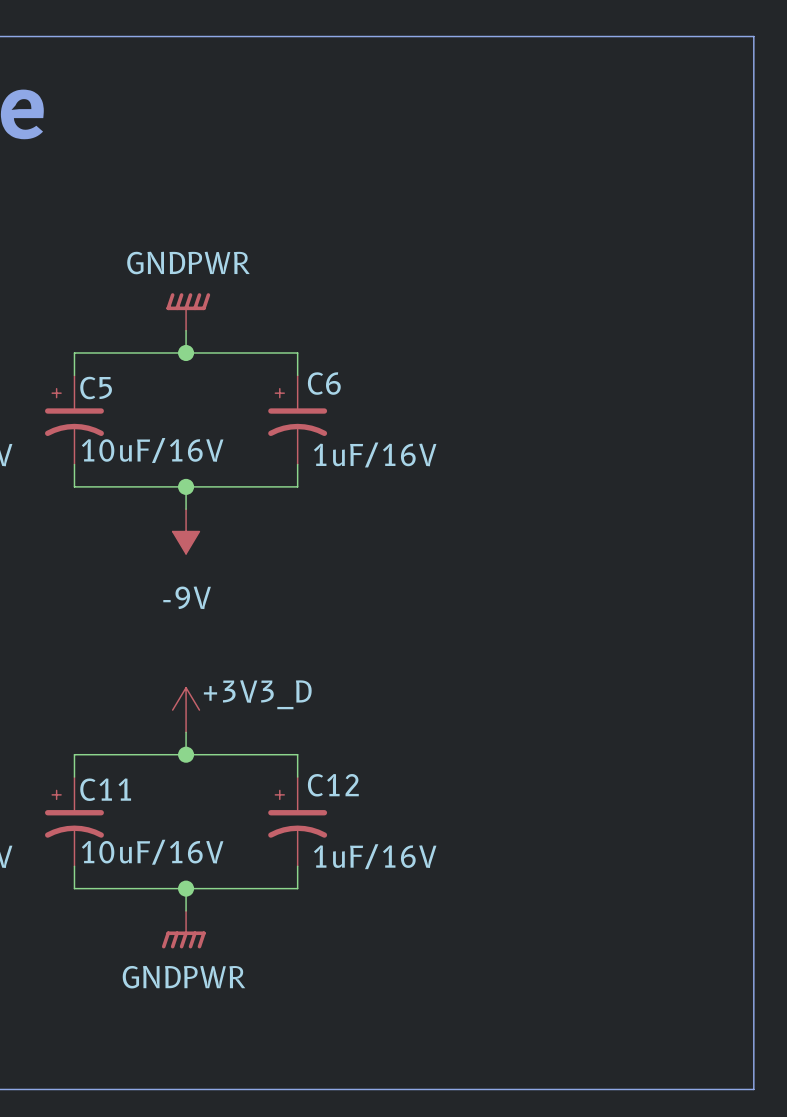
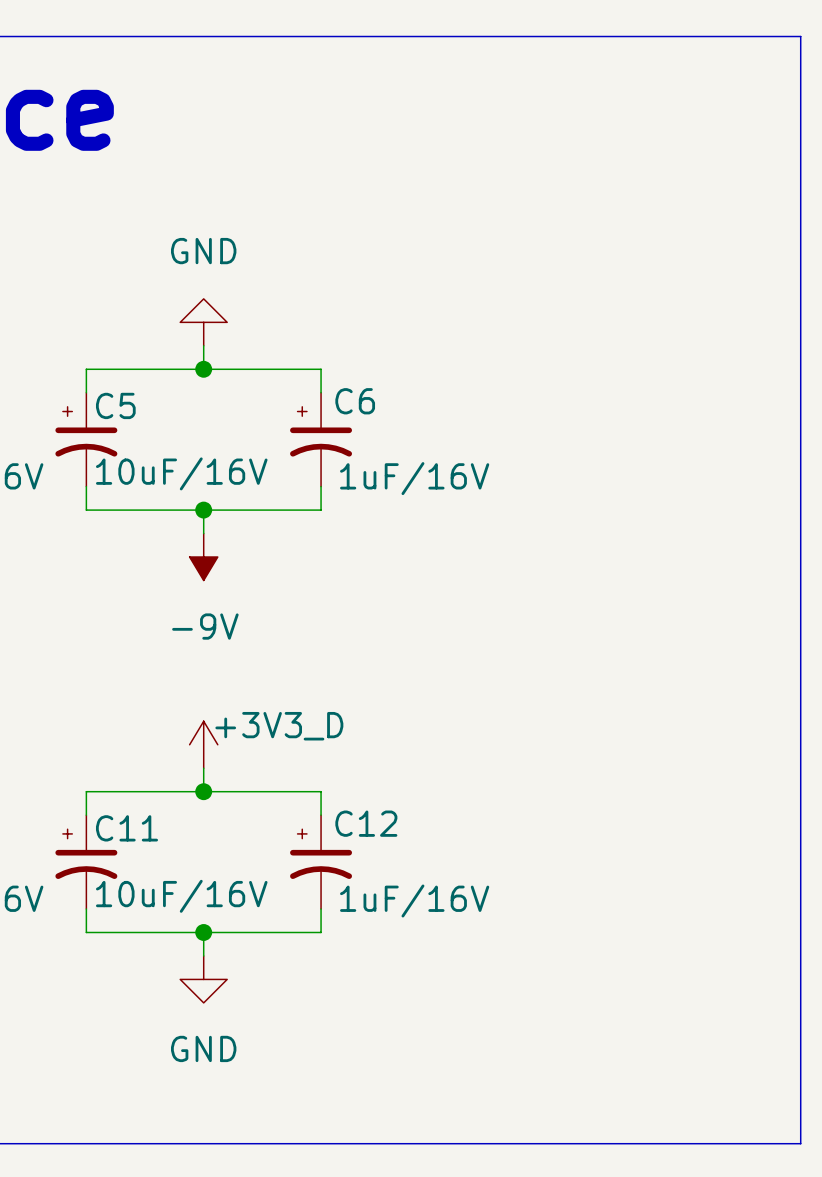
power symbol: GNDPWR (188, 311) -> GND (203, 322)
power symbol: GNDPWR (183, 929) -> GND (203, 979)

